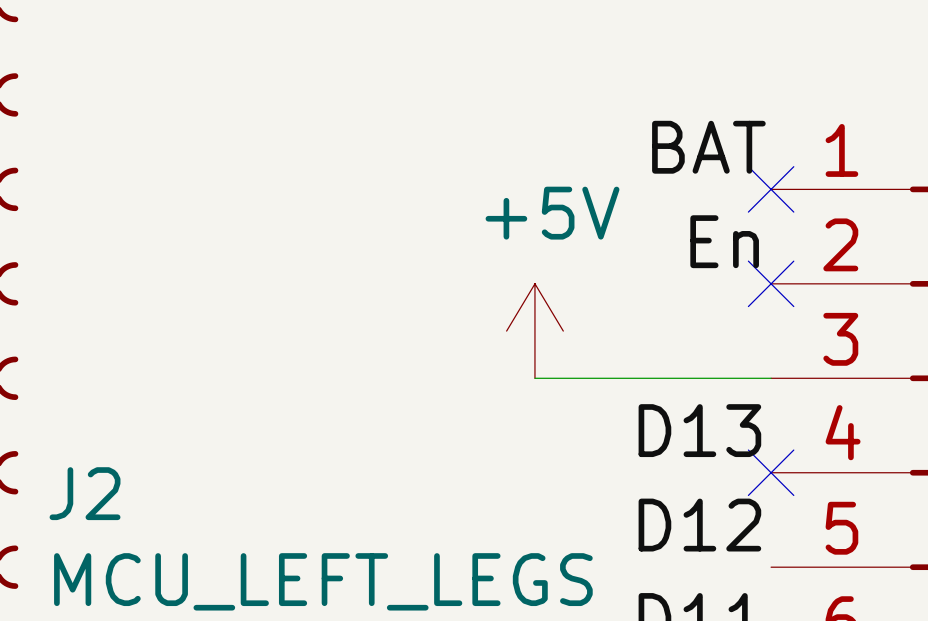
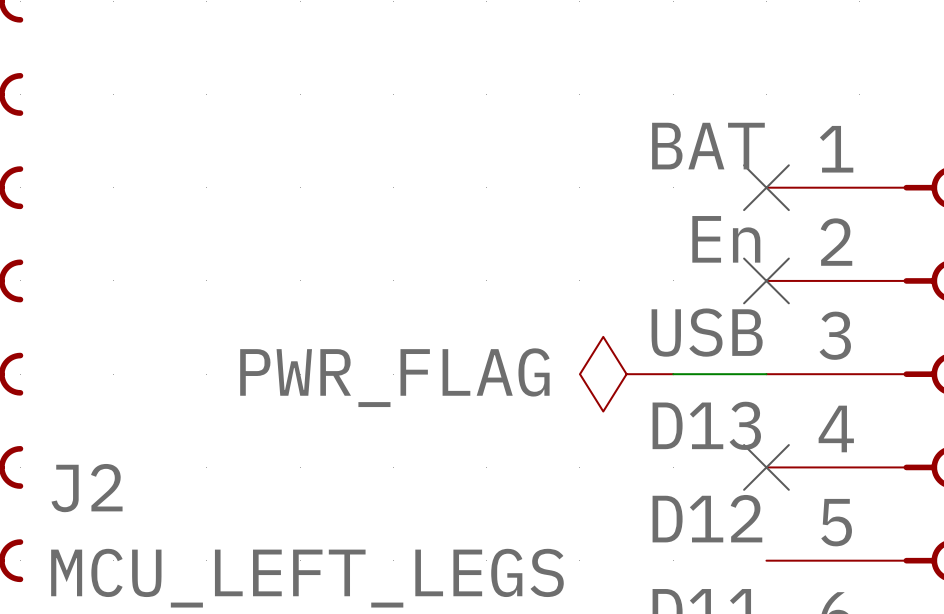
power symbol: +5V (534, 331) -> none
label: none -> USB (707, 332)
wire: (534, 378) (676, 378) -> none
power symbol: none -> PWR_FLAG (626, 374)

